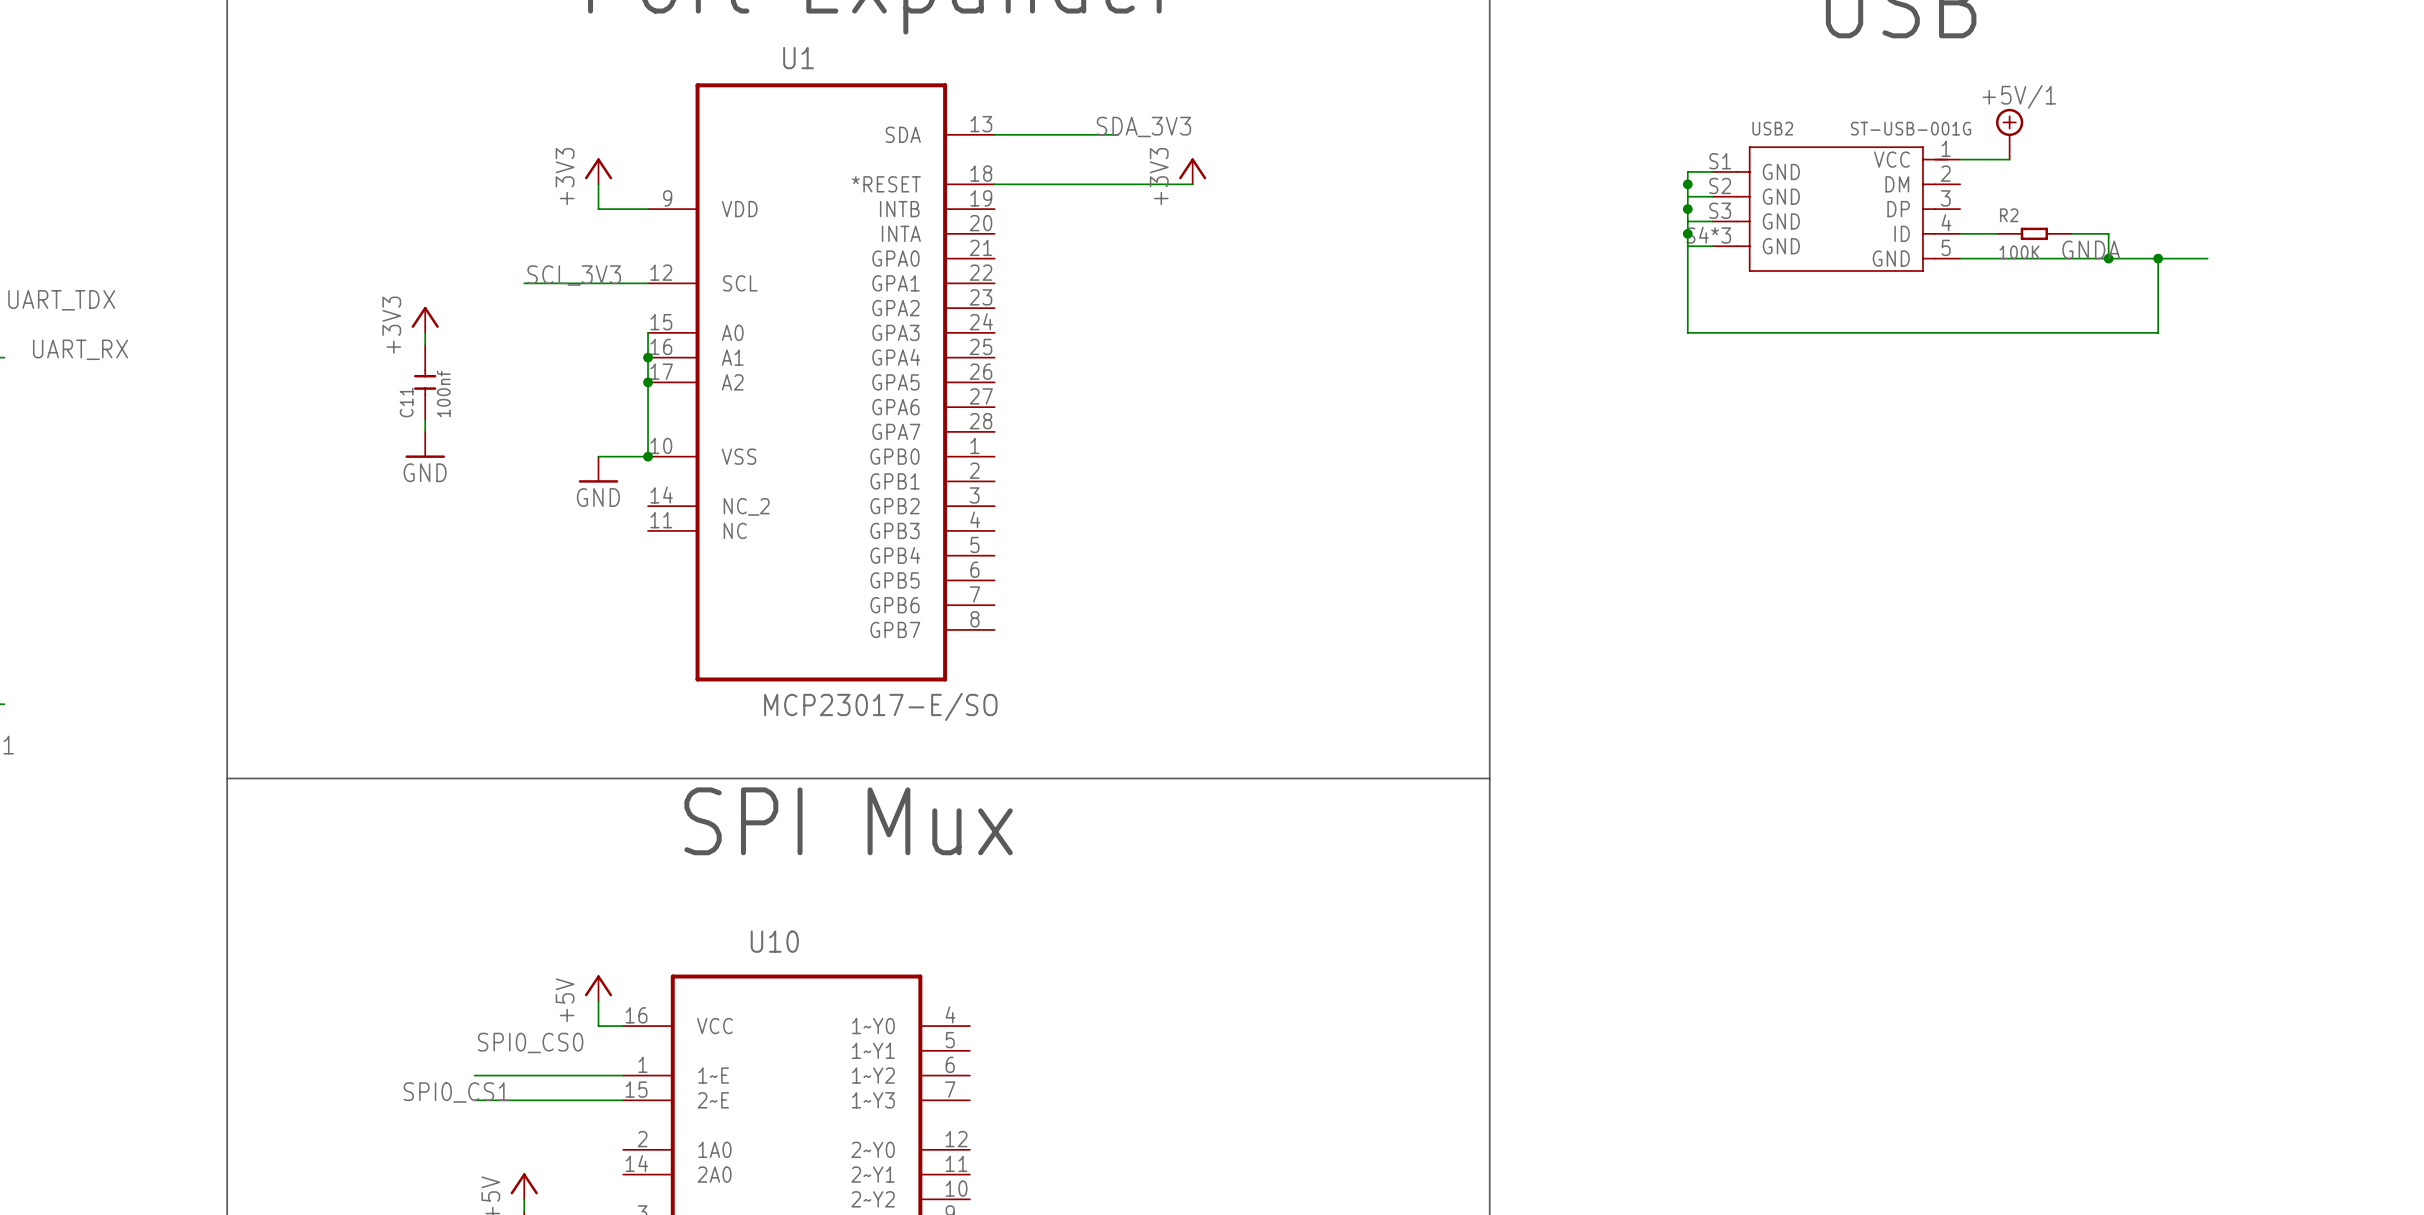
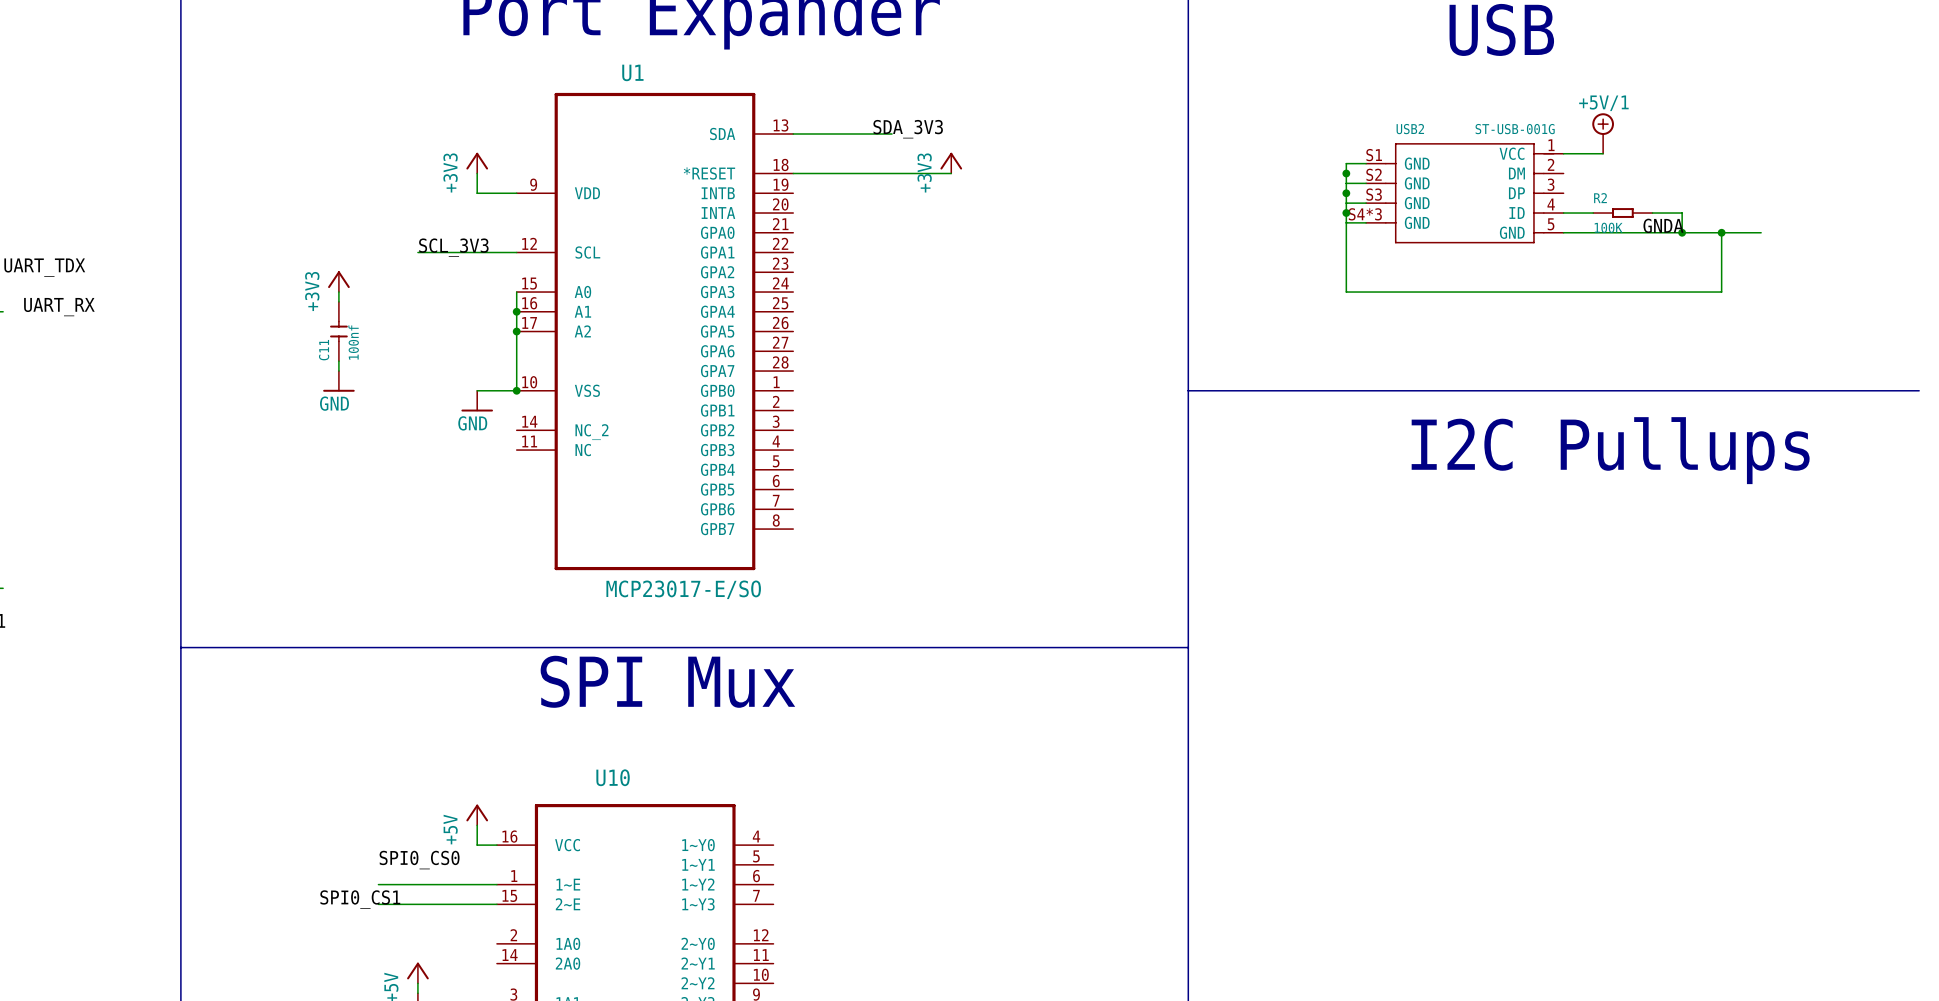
line: none -> (1188, 390) (1919, 390)
text: none -> I2C Pullups (1610, 450)

